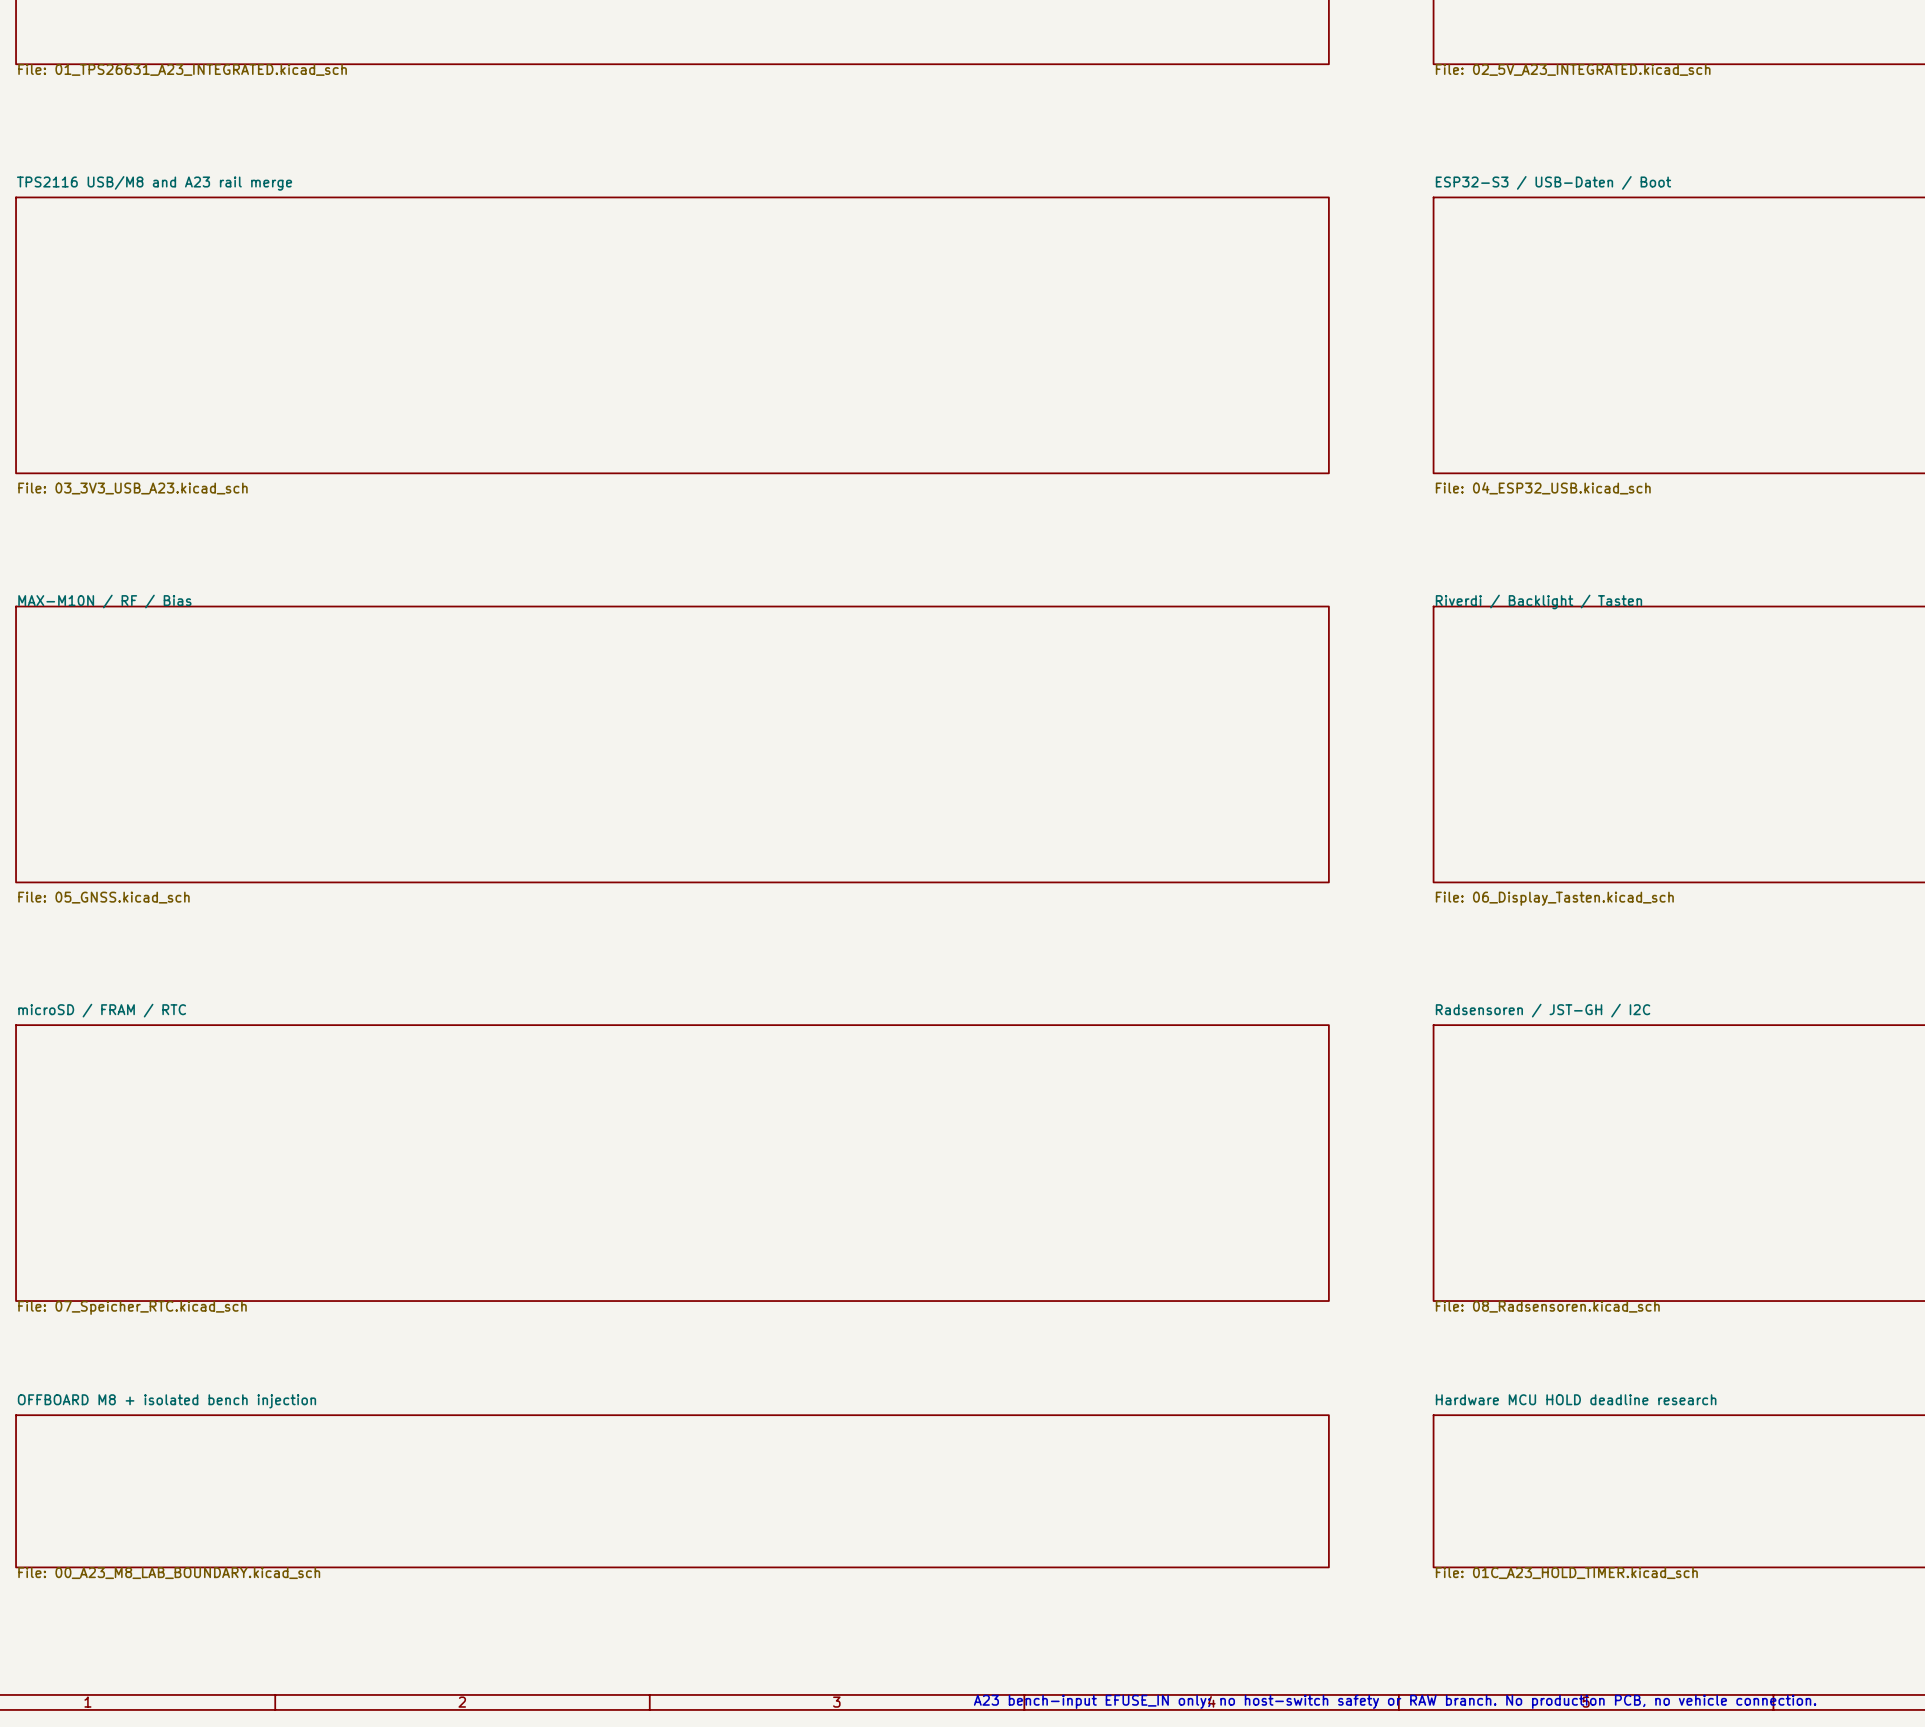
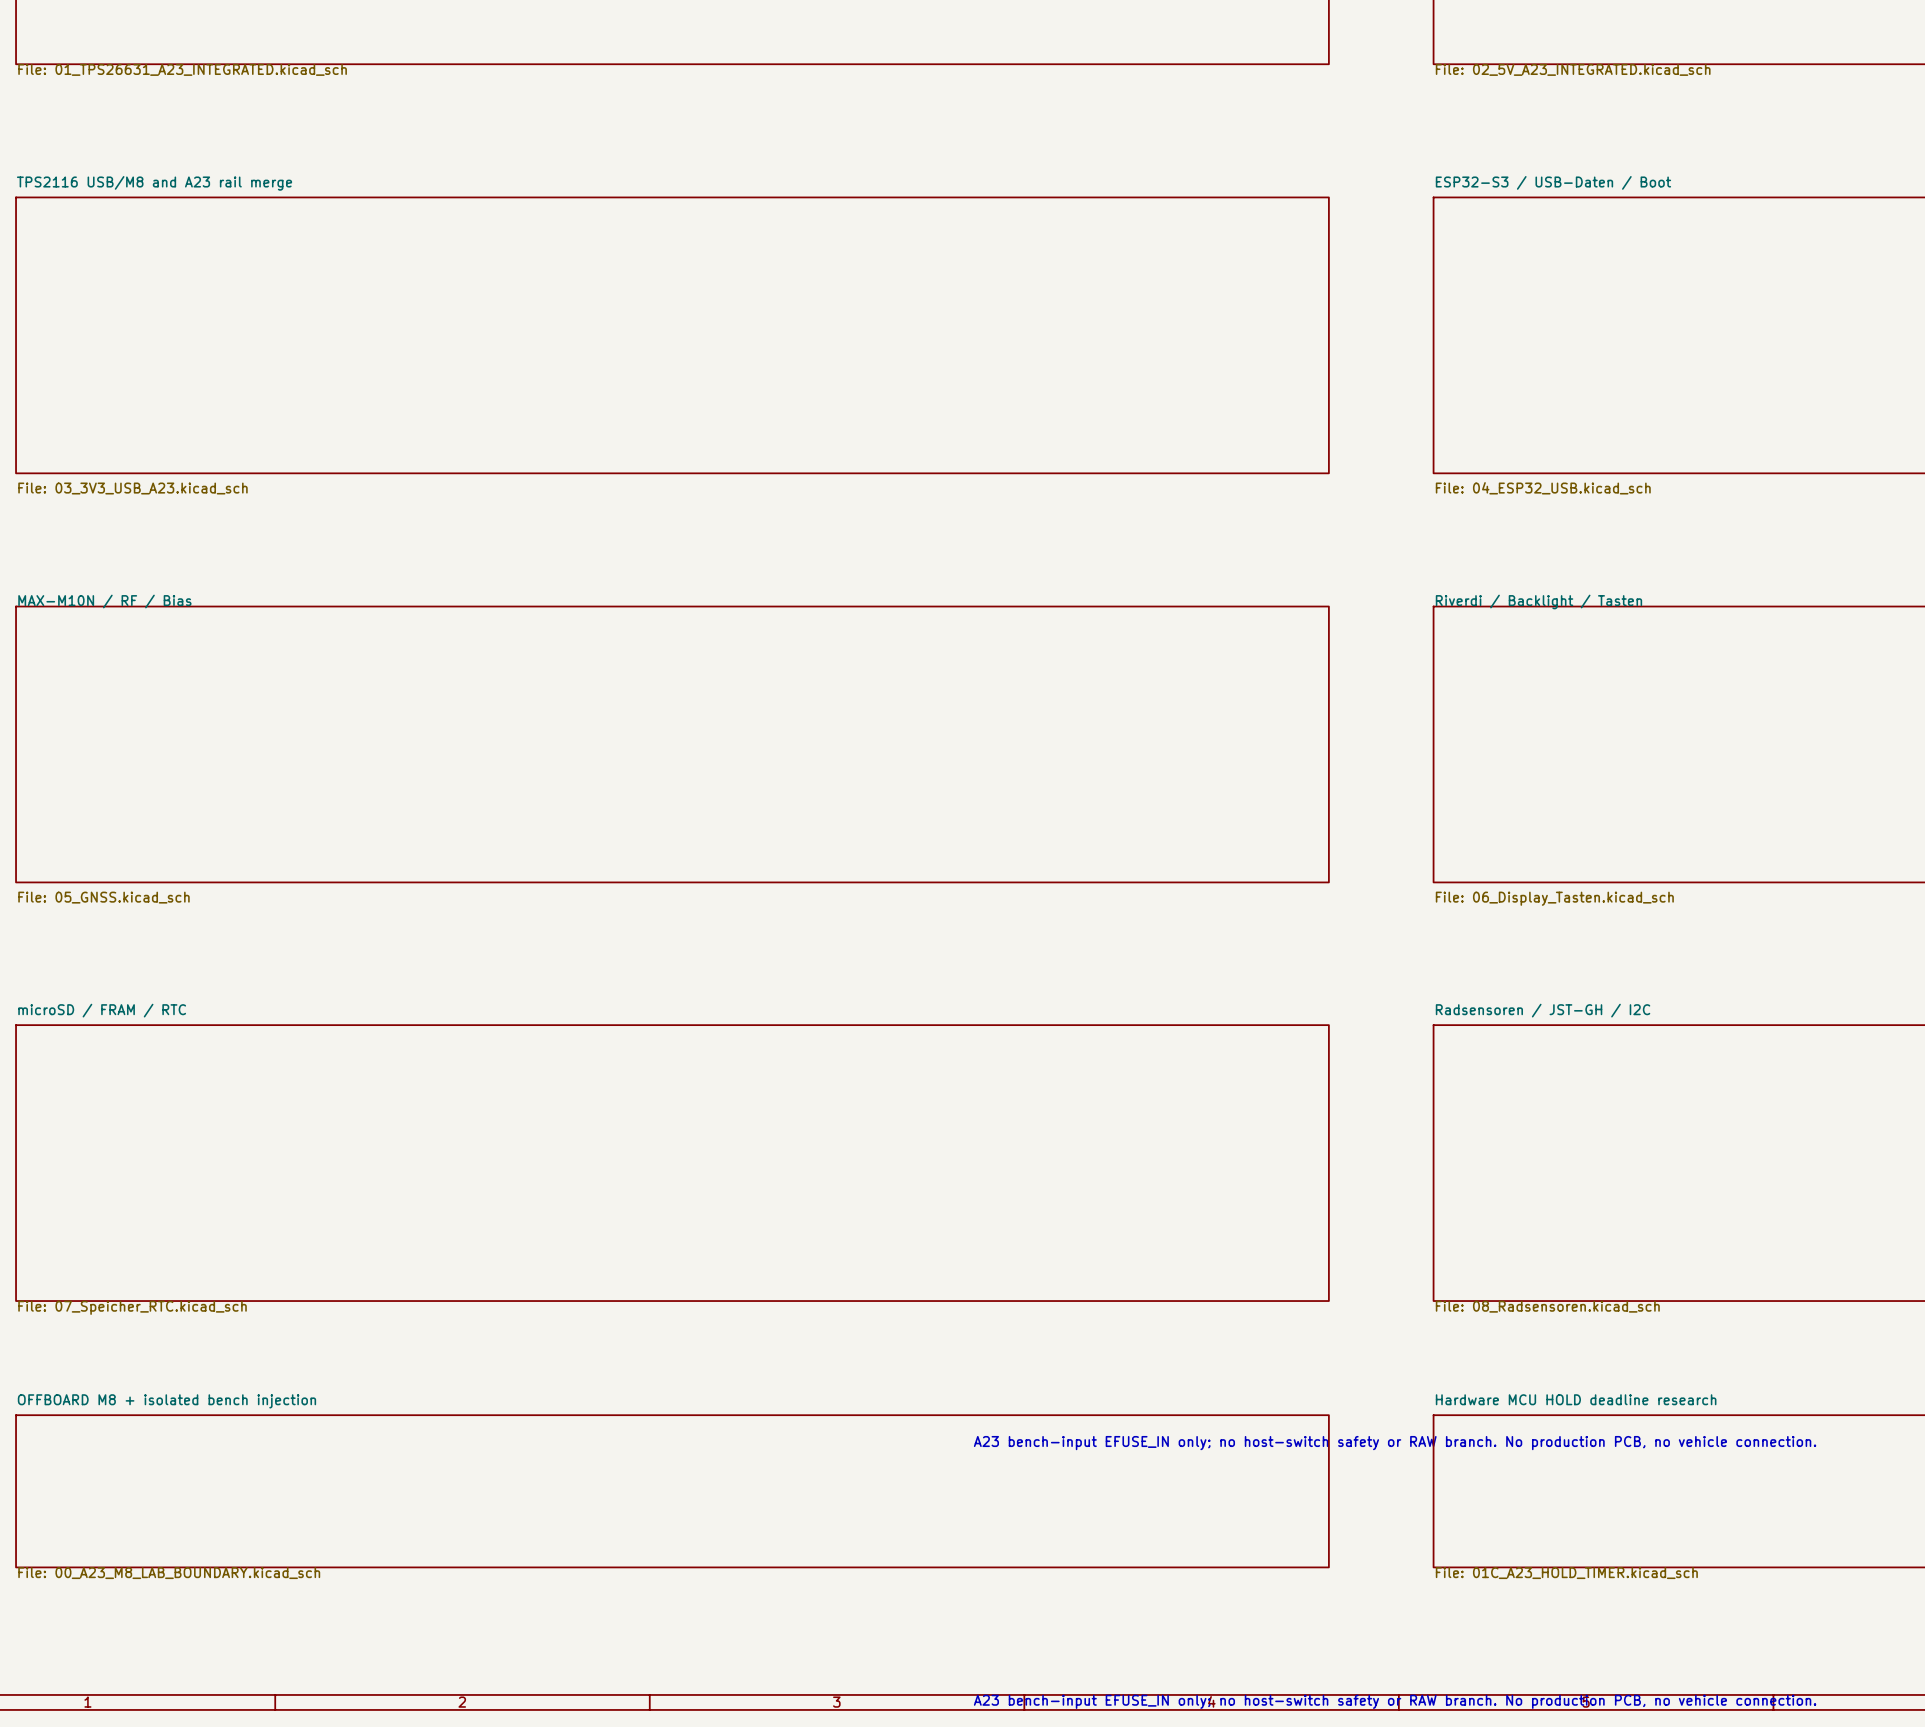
text: none -> A23 bench-input EFUSE_IN only; no host-switch safety or RAW branch. No production PCB, no vehicle connection. (1395, 1443)

